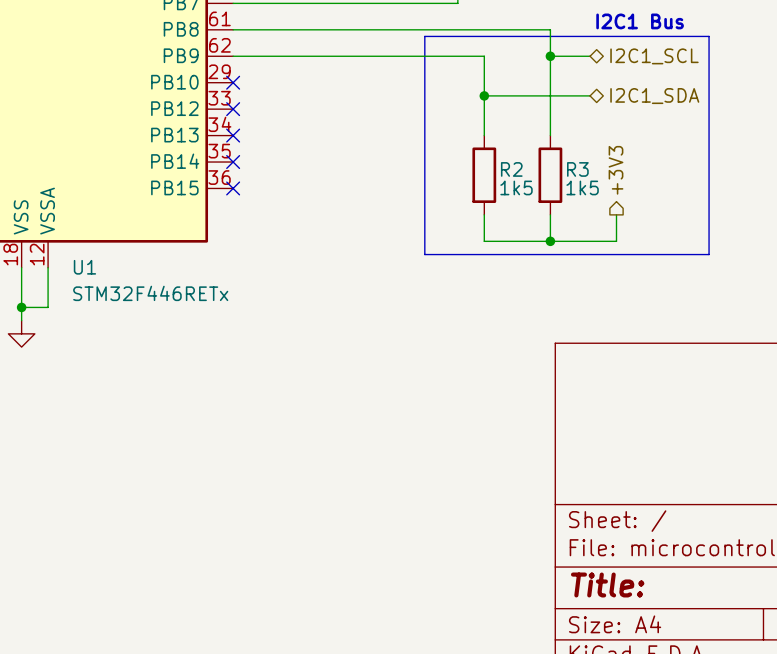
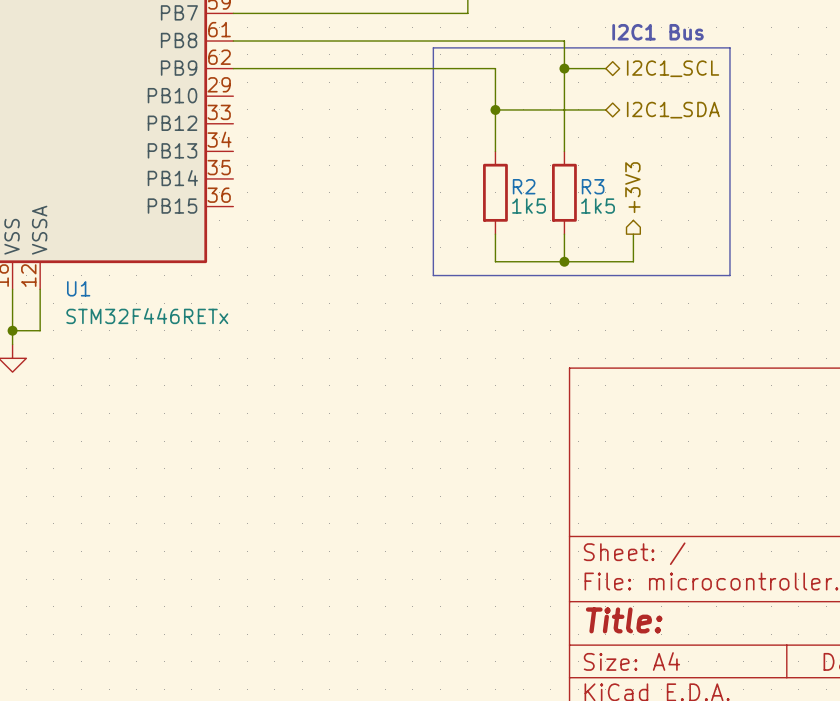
no-connect mark: (233, 82) -> none
no-connect mark: (233, 109) -> none
no-connect mark: (233, 135) -> none
no-connect mark: (233, 162) -> none
no-connect mark: (233, 188) -> none

